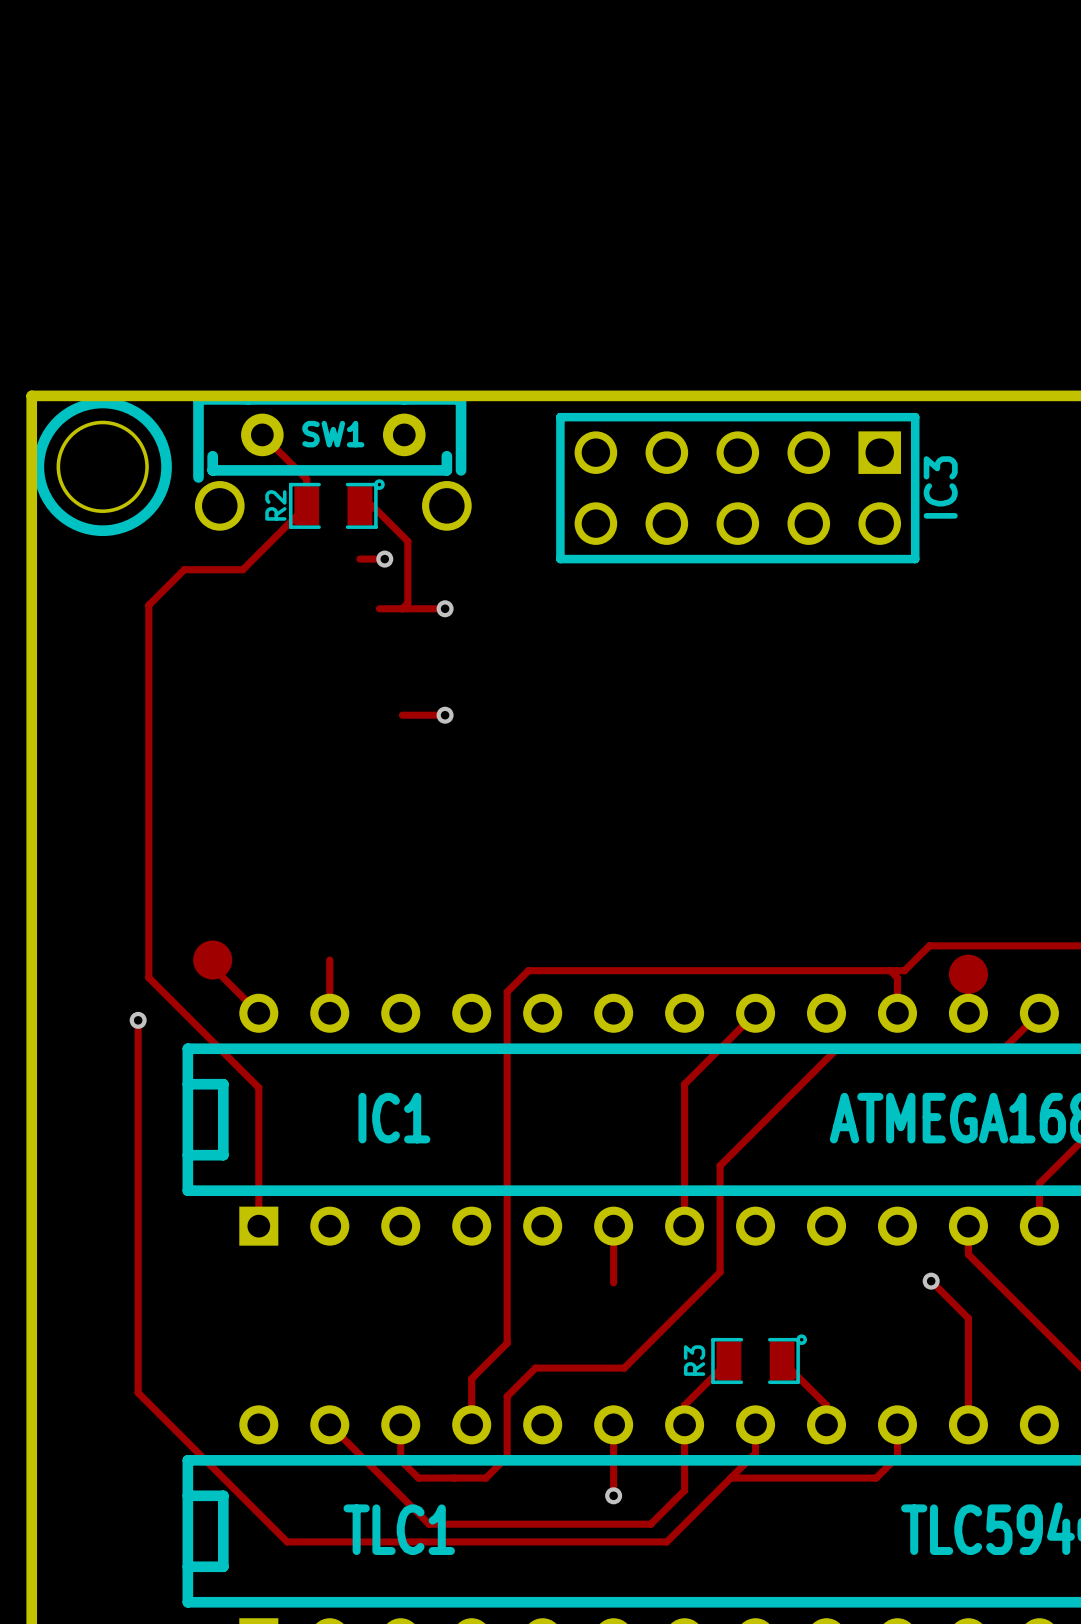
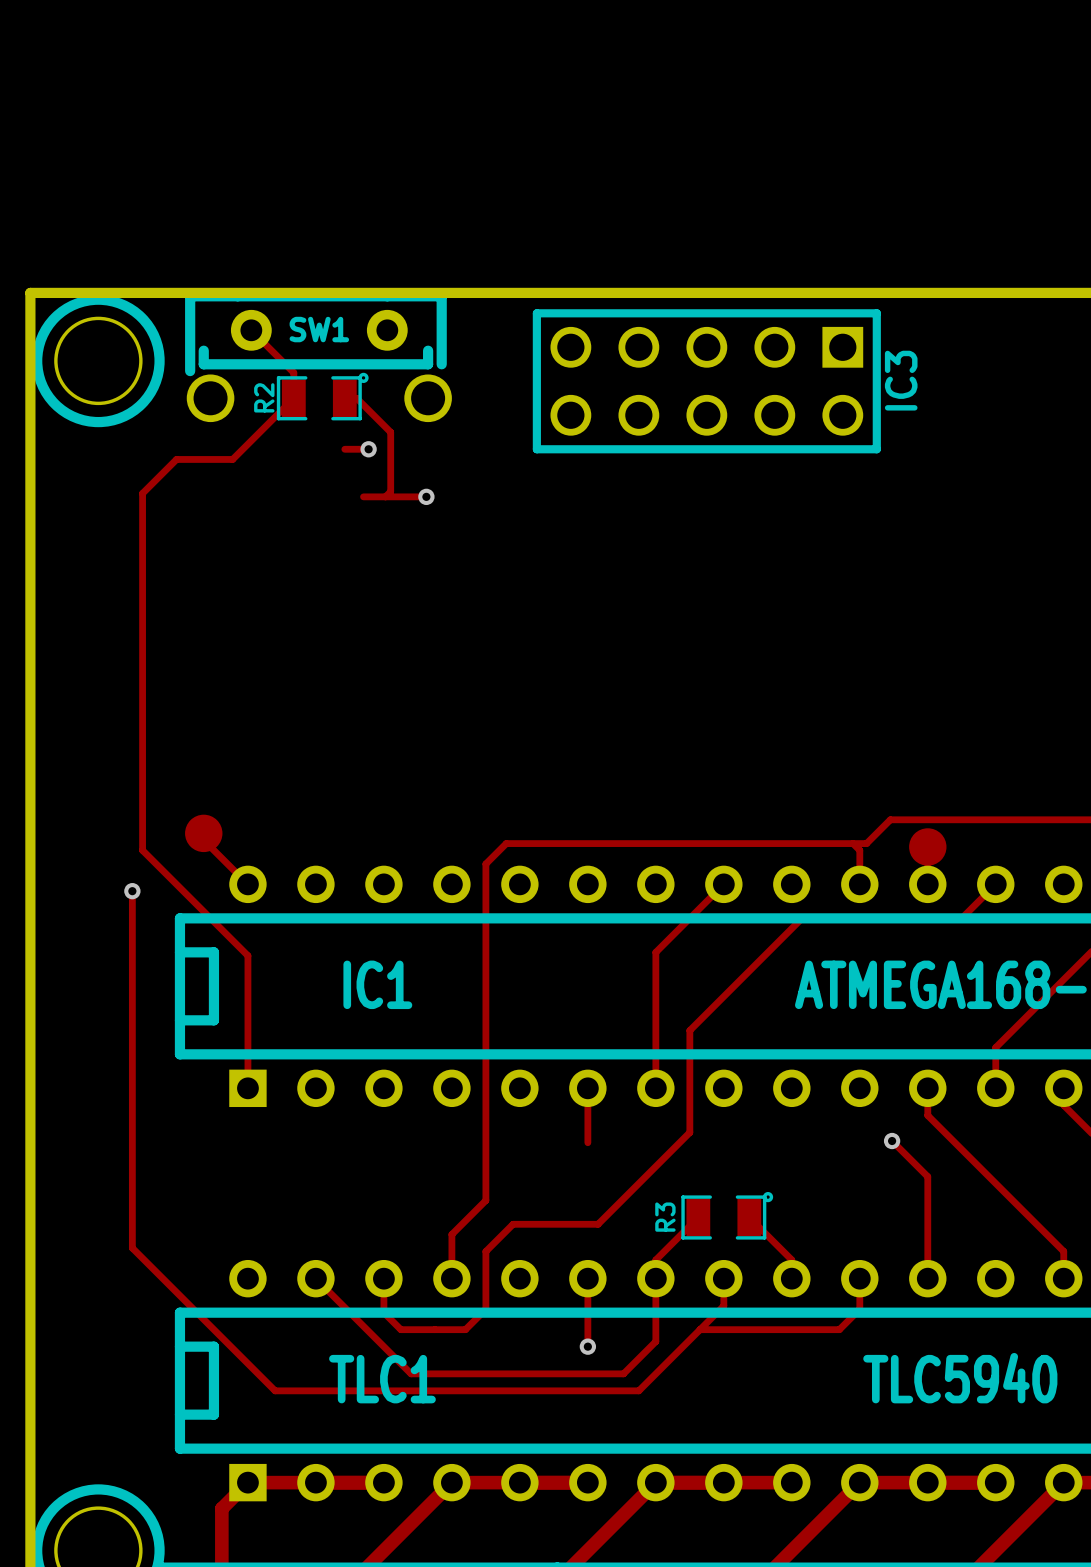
track: (402, 715) (445, 715) -> none
via: (445, 715) -> none
track: (329, 960) (329, 1013) -> none

